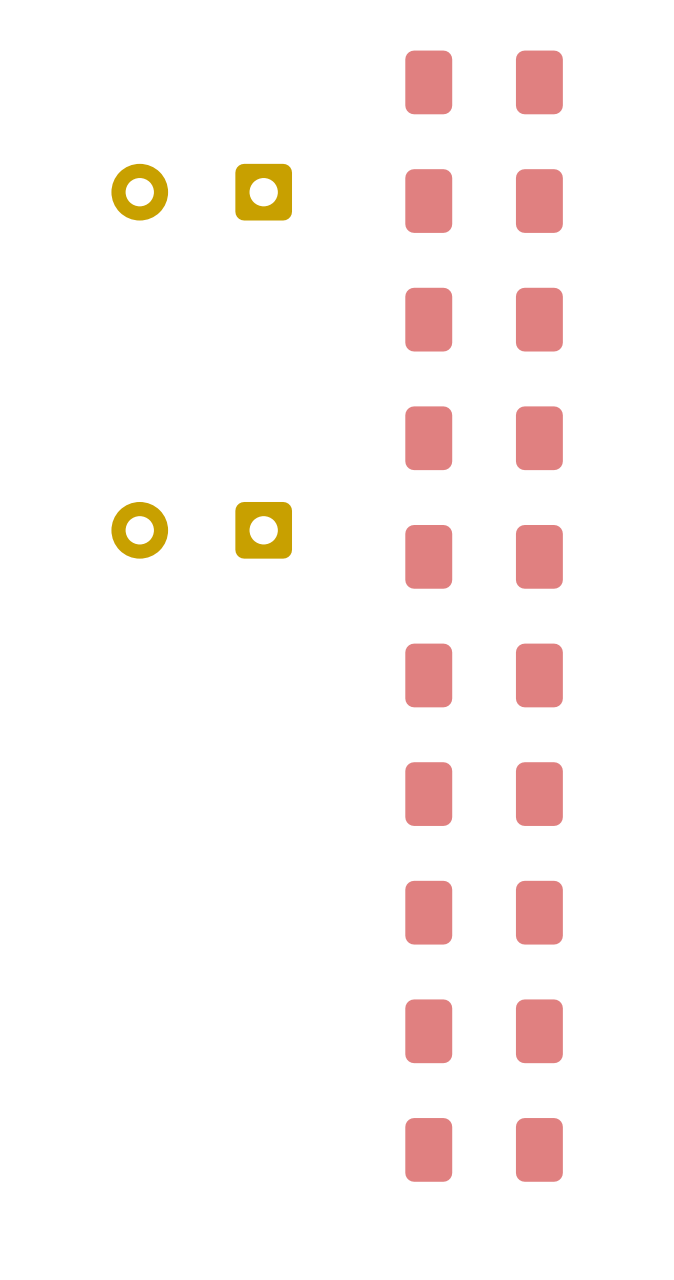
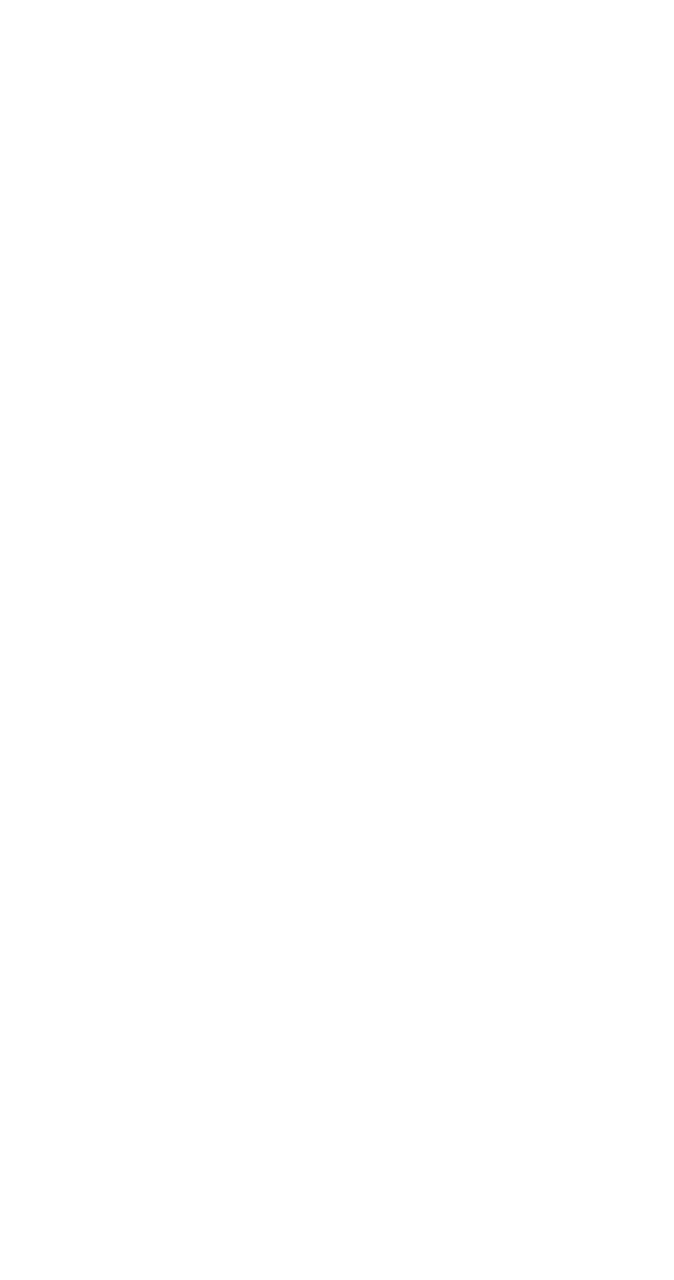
part: (484, 82) -> none
part: (201, 192) -> none
part: (484, 201) -> none
part: (484, 319) -> none
part: (484, 438) -> none
part: (201, 530) -> none
part: (484, 556) -> none
part: (484, 675) -> none
part: (484, 794) -> none
part: (484, 912) -> none
part: (484, 1031) -> none
part: (484, 1149) -> none

